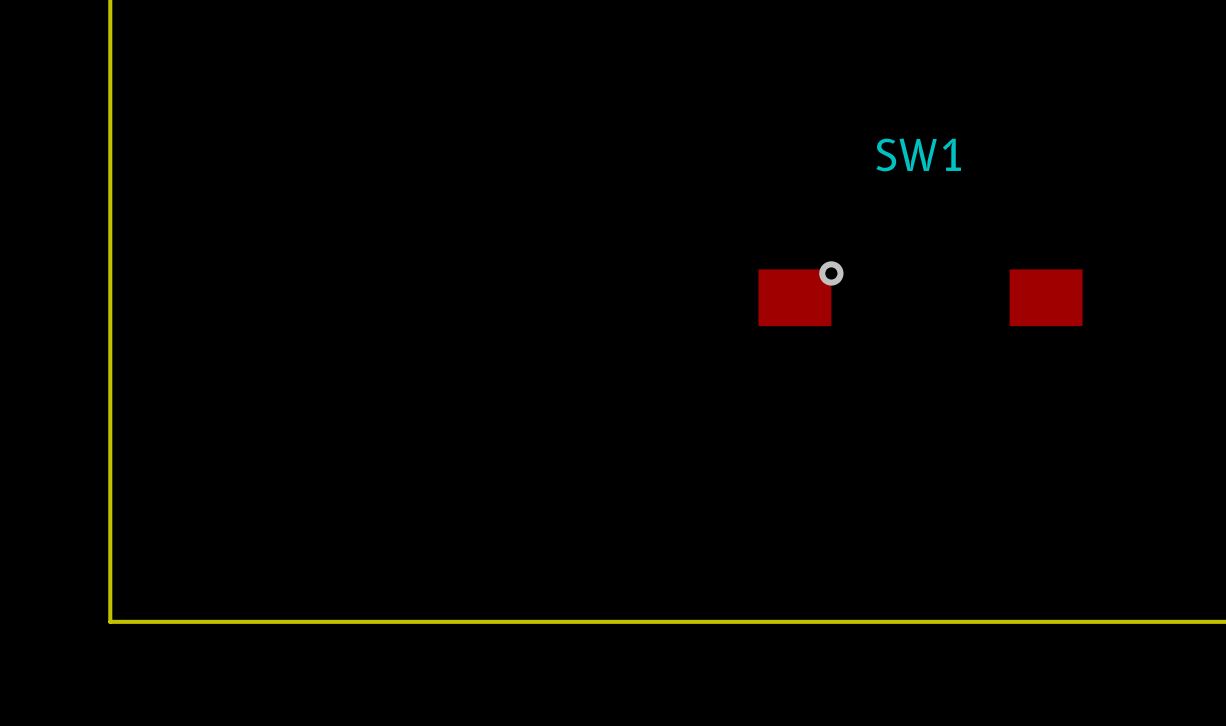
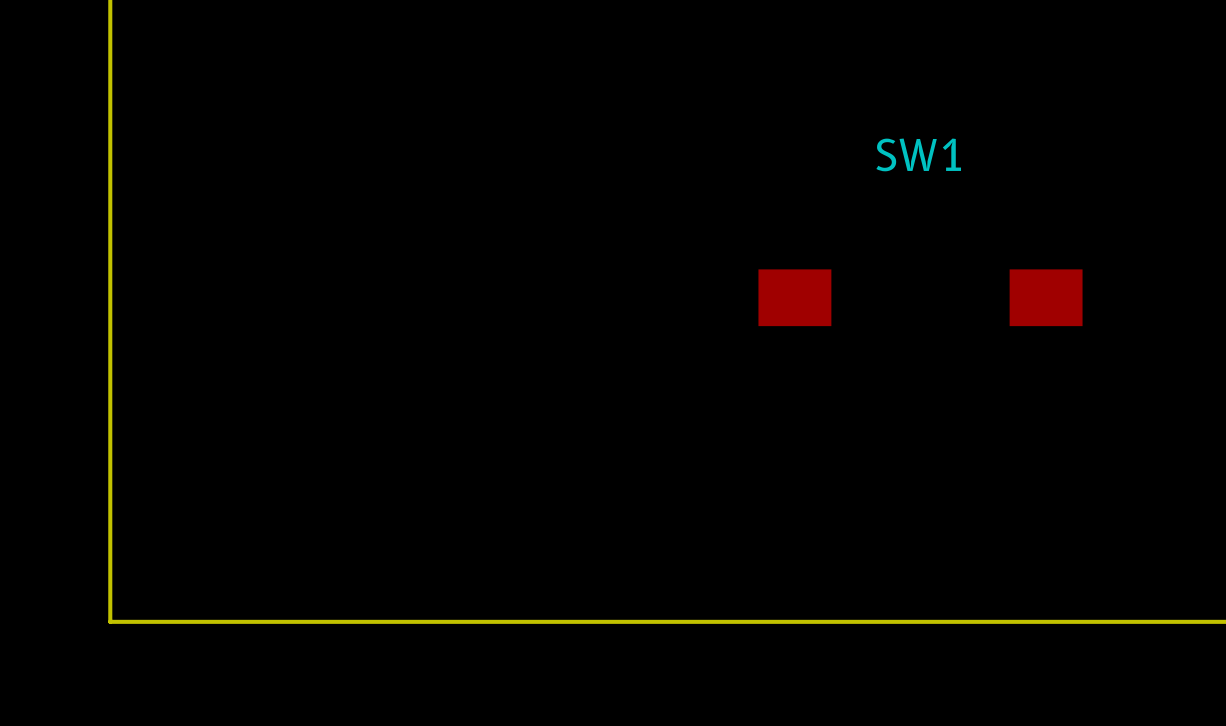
via: (831, 273) -> none

